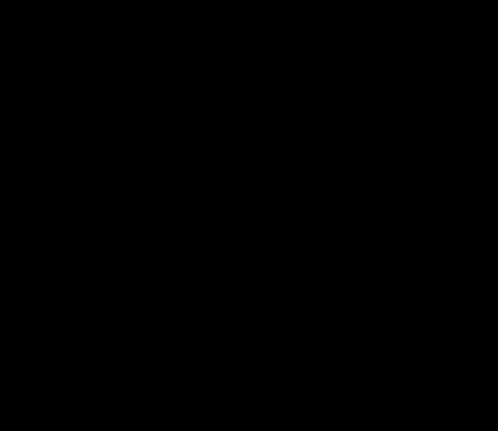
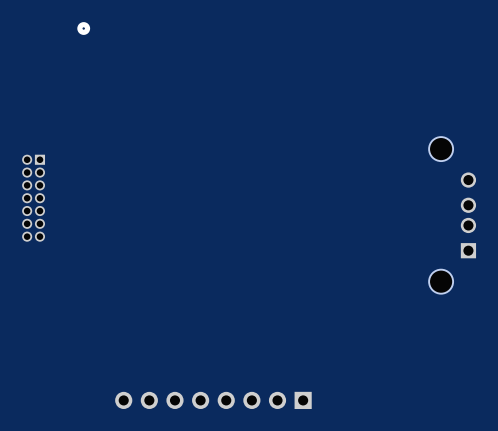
part: none -> (83, 28)
part: none -> (33, 198)
part: none -> (452, 215)
part: none -> (213, 400)

